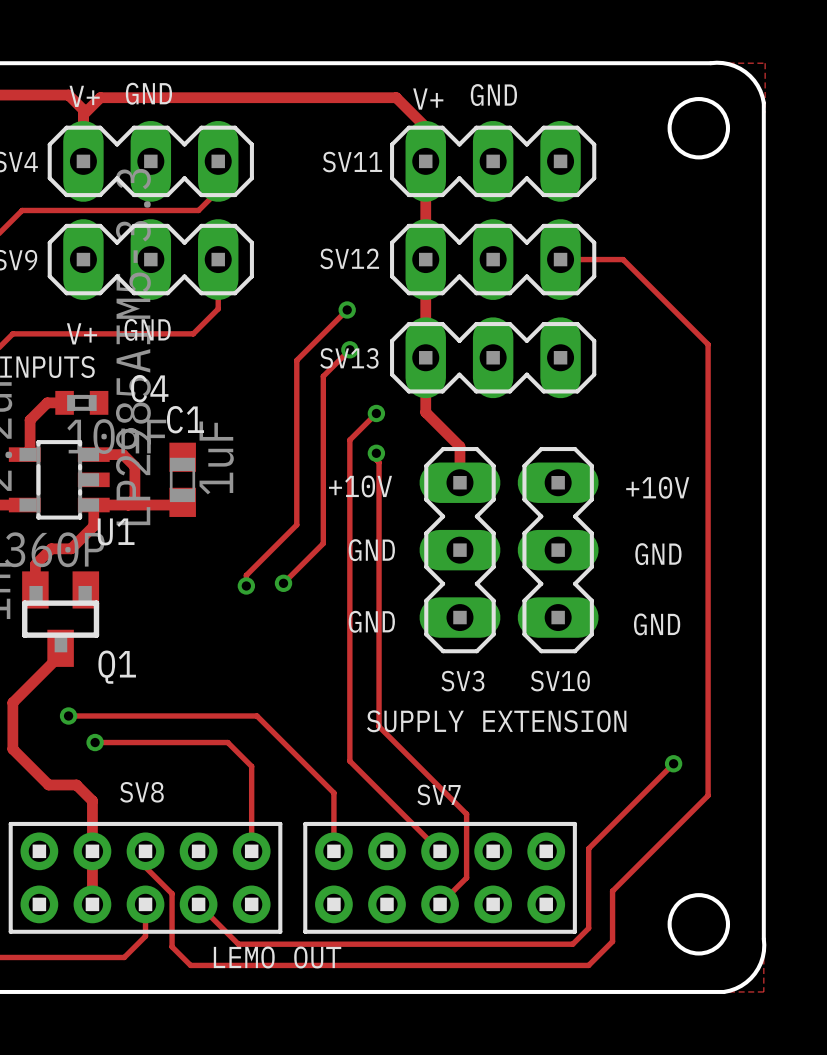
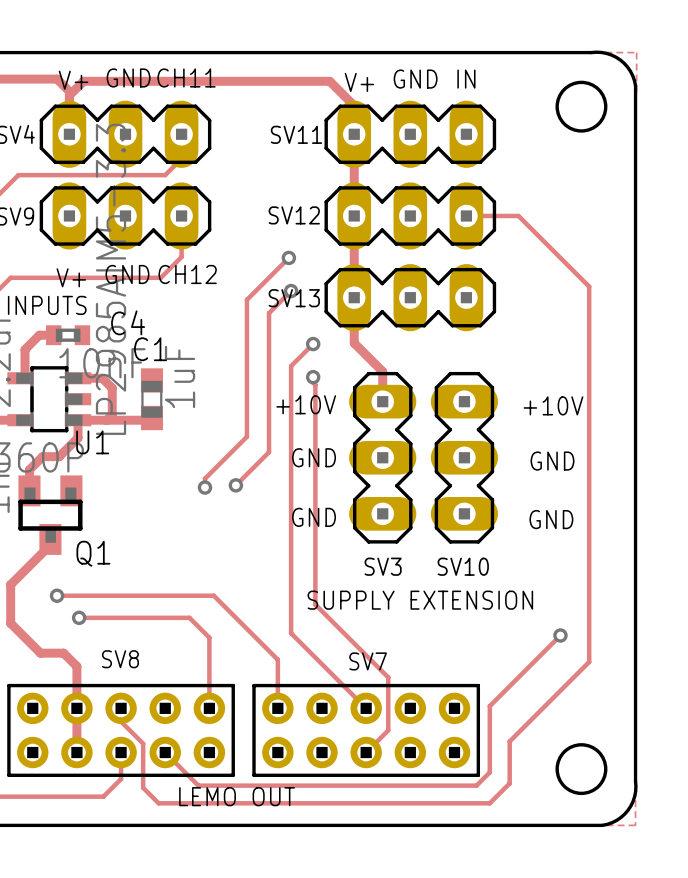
text: none -> CH11 (186, 77)
text: none -> IN (466, 79)
text: none -> CH12 (187, 274)

